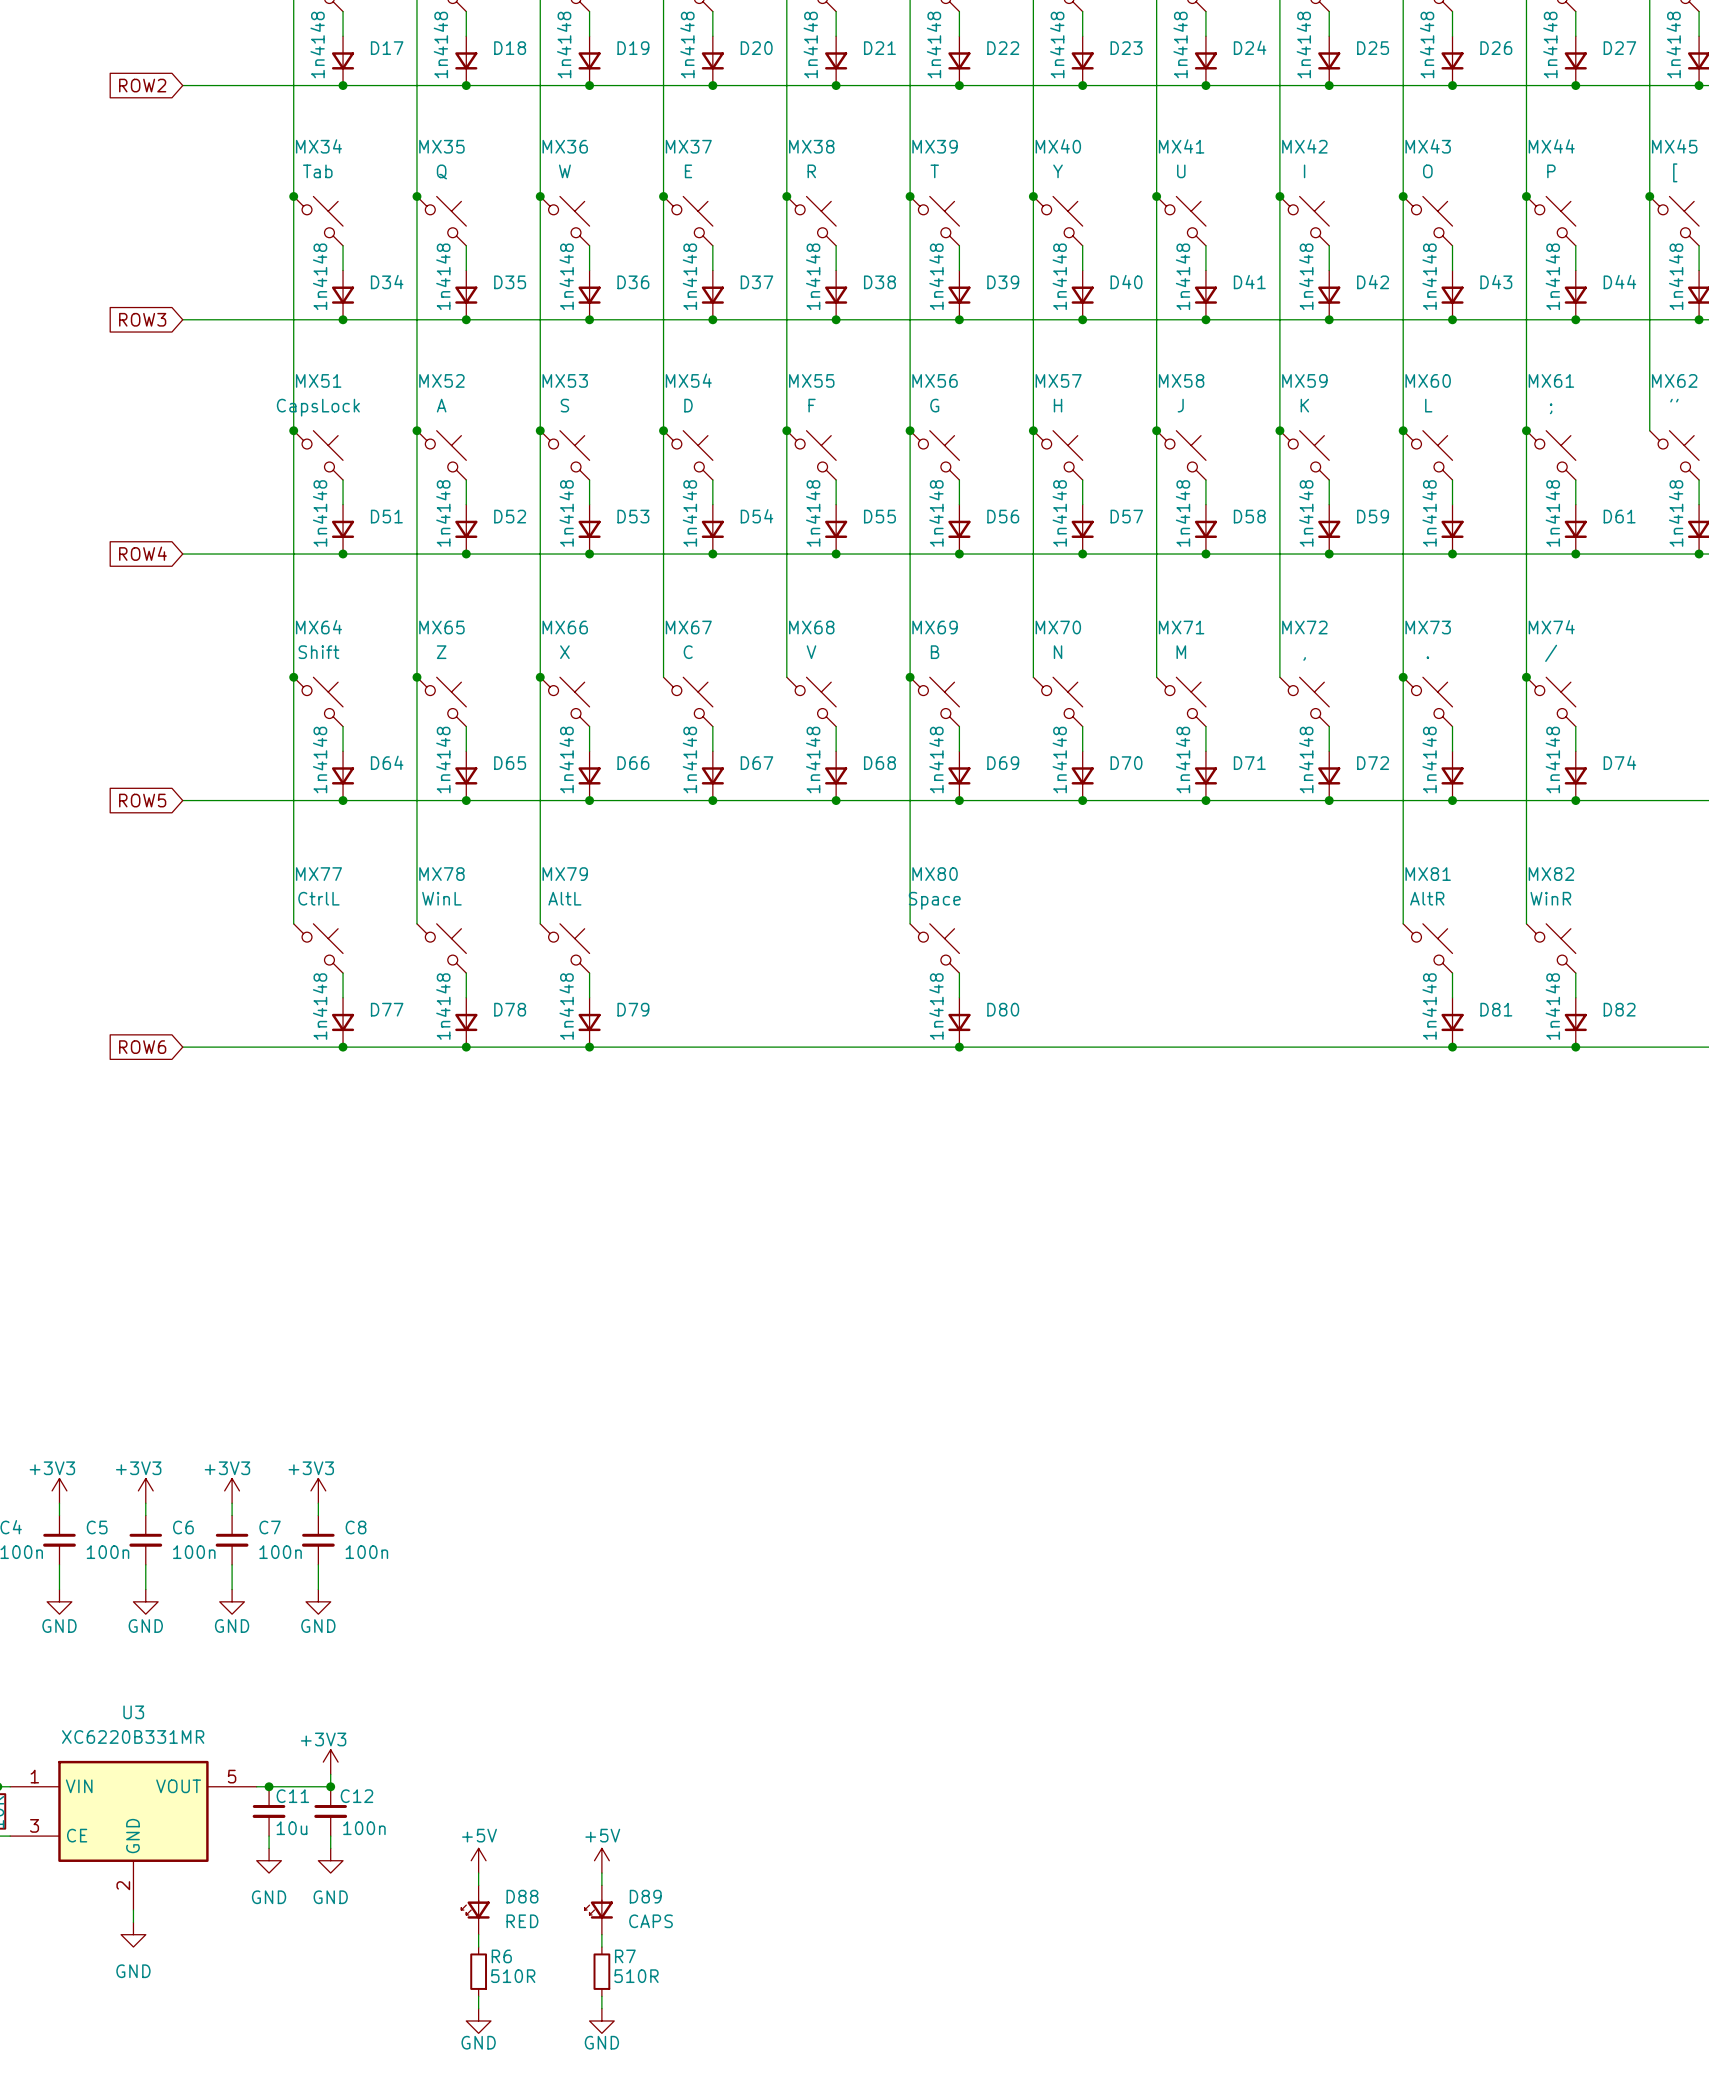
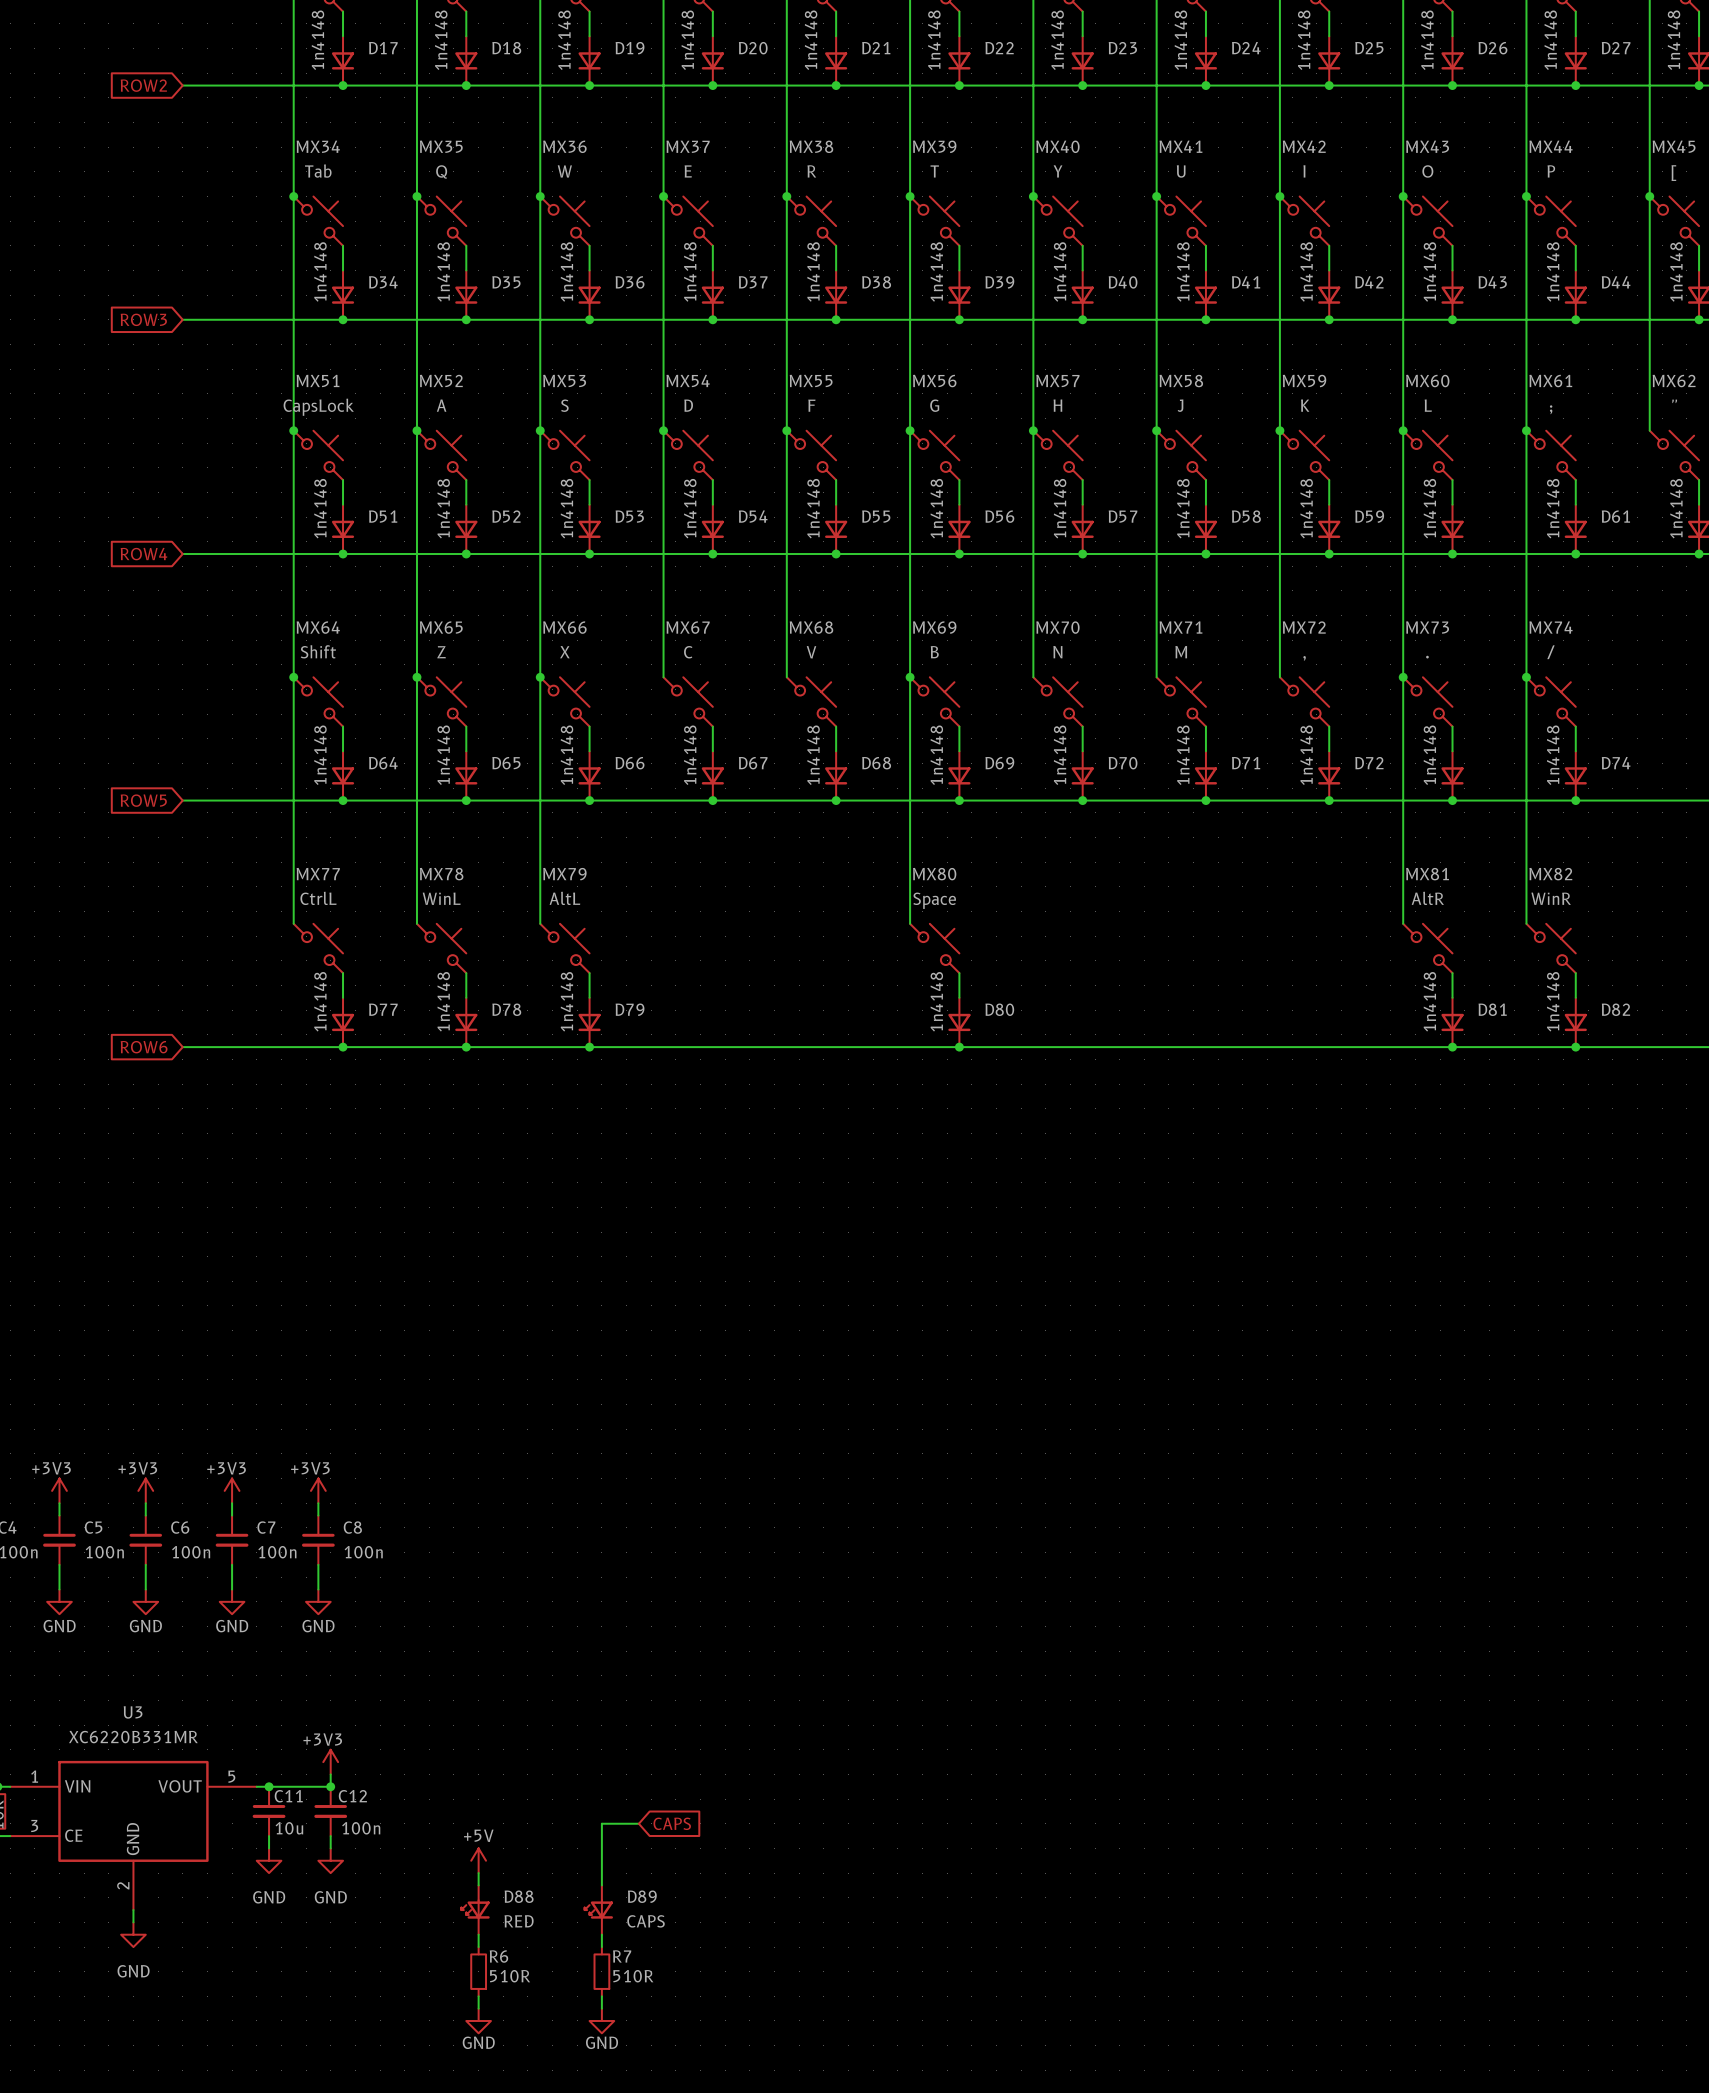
wire: none -> (638, 1823) (601, 1823) (601, 1873)
global label: none -> CAPS (672, 1823)
power symbol: +5V (601, 1860) -> none

